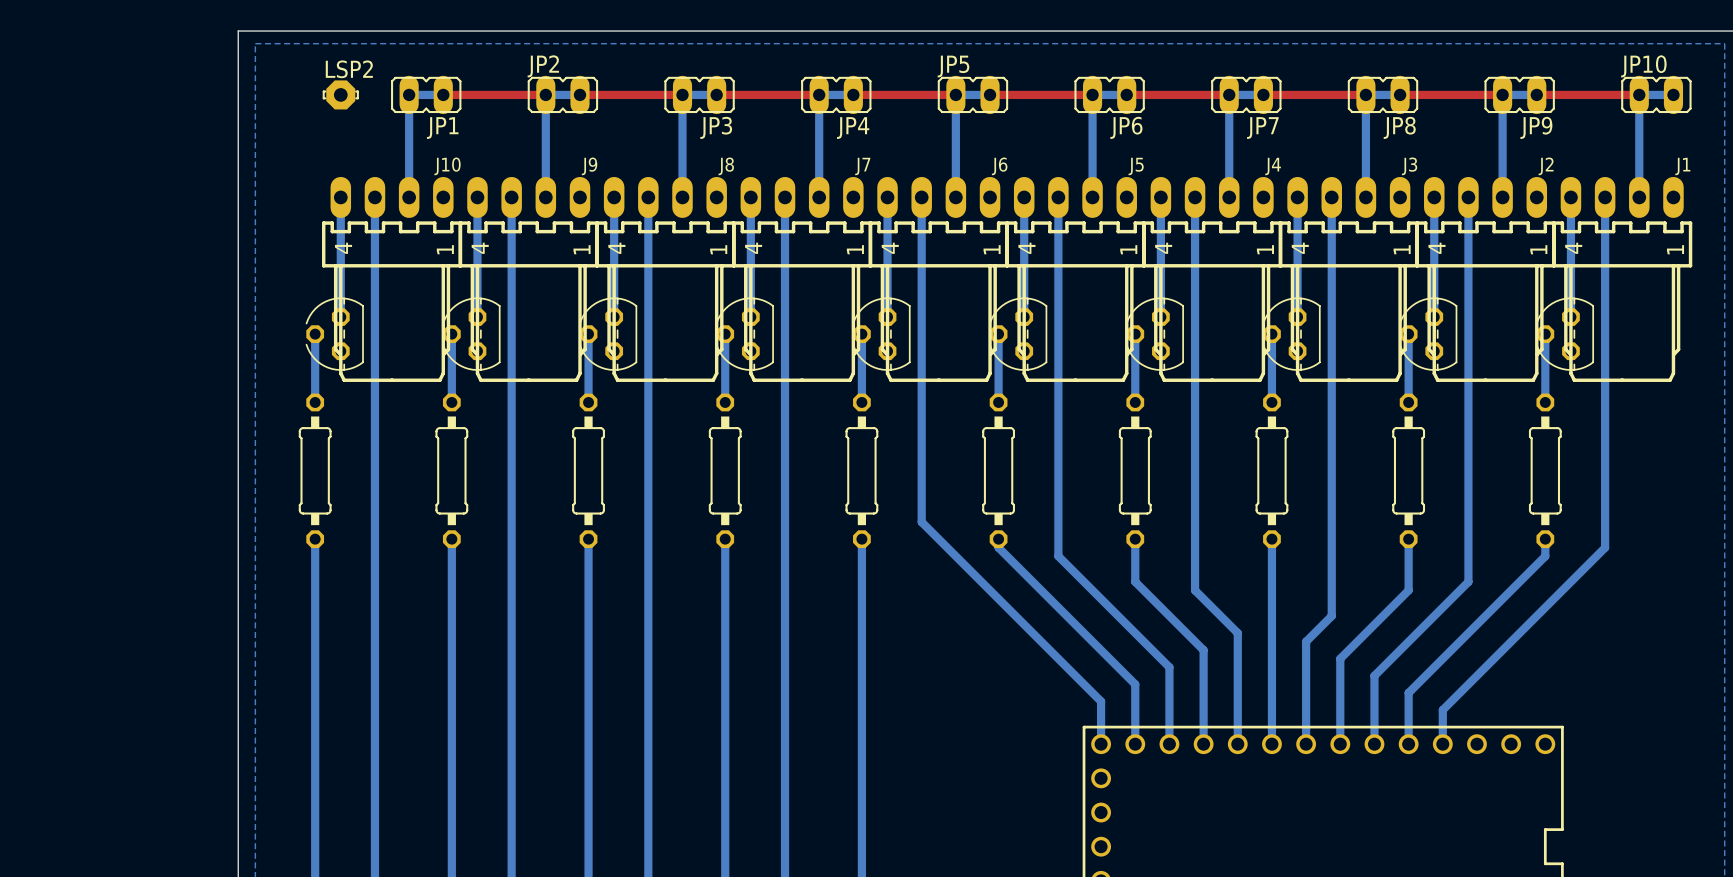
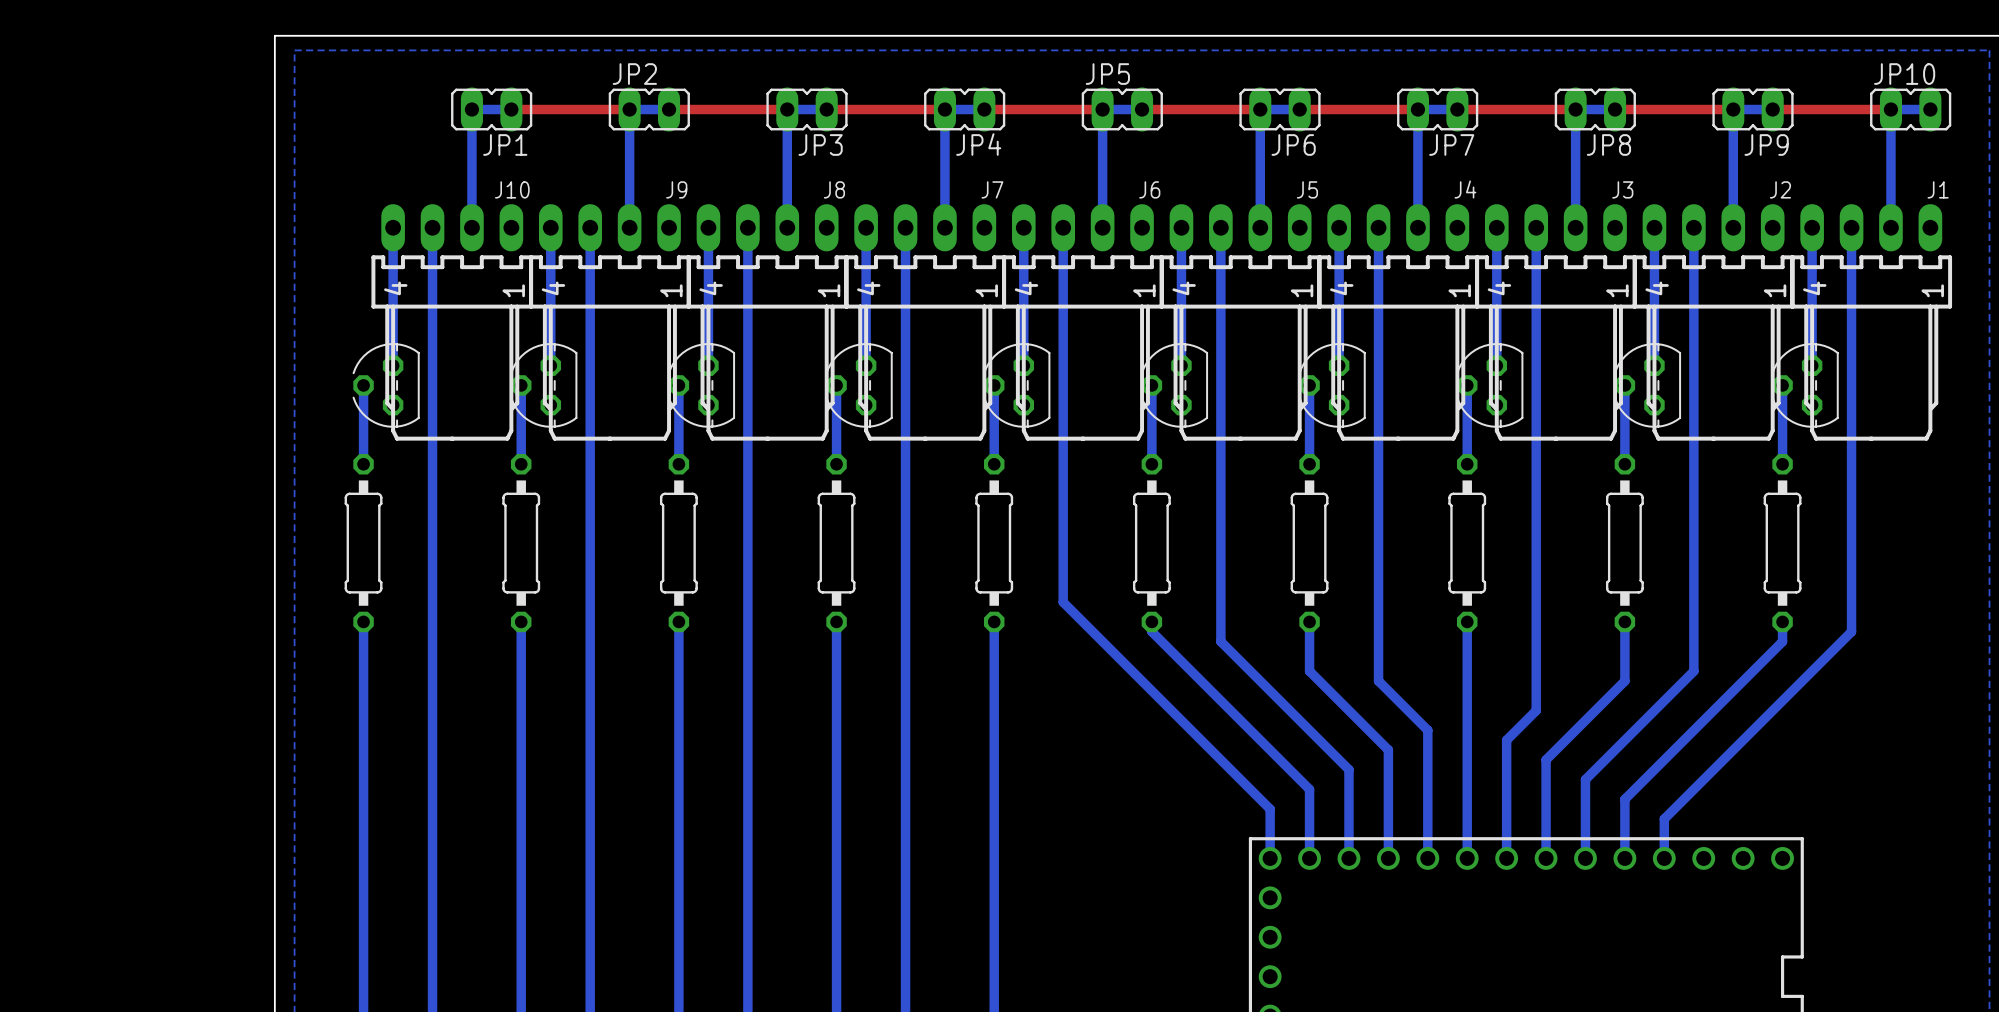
LSP2: (340, 94) -> none

